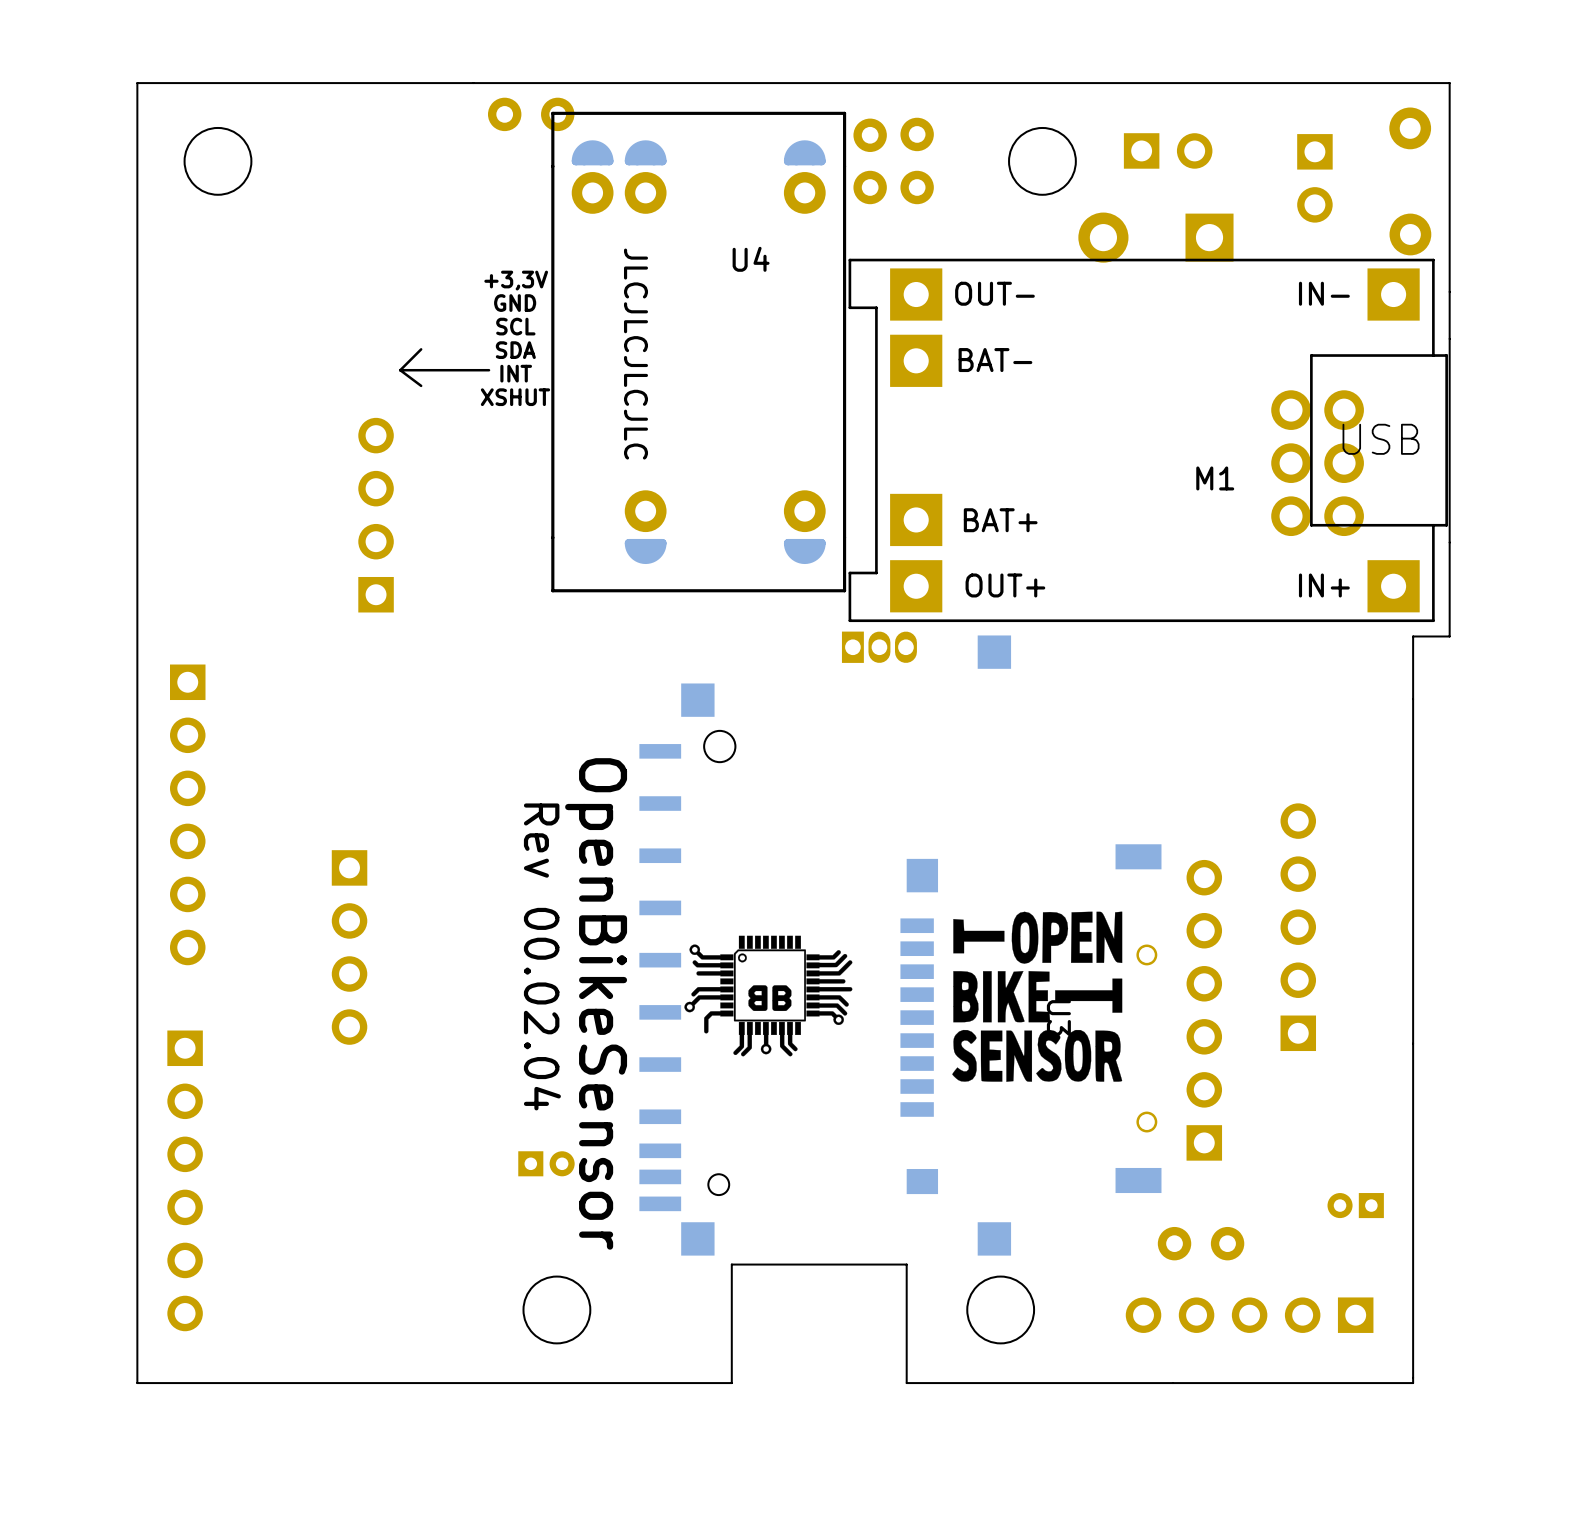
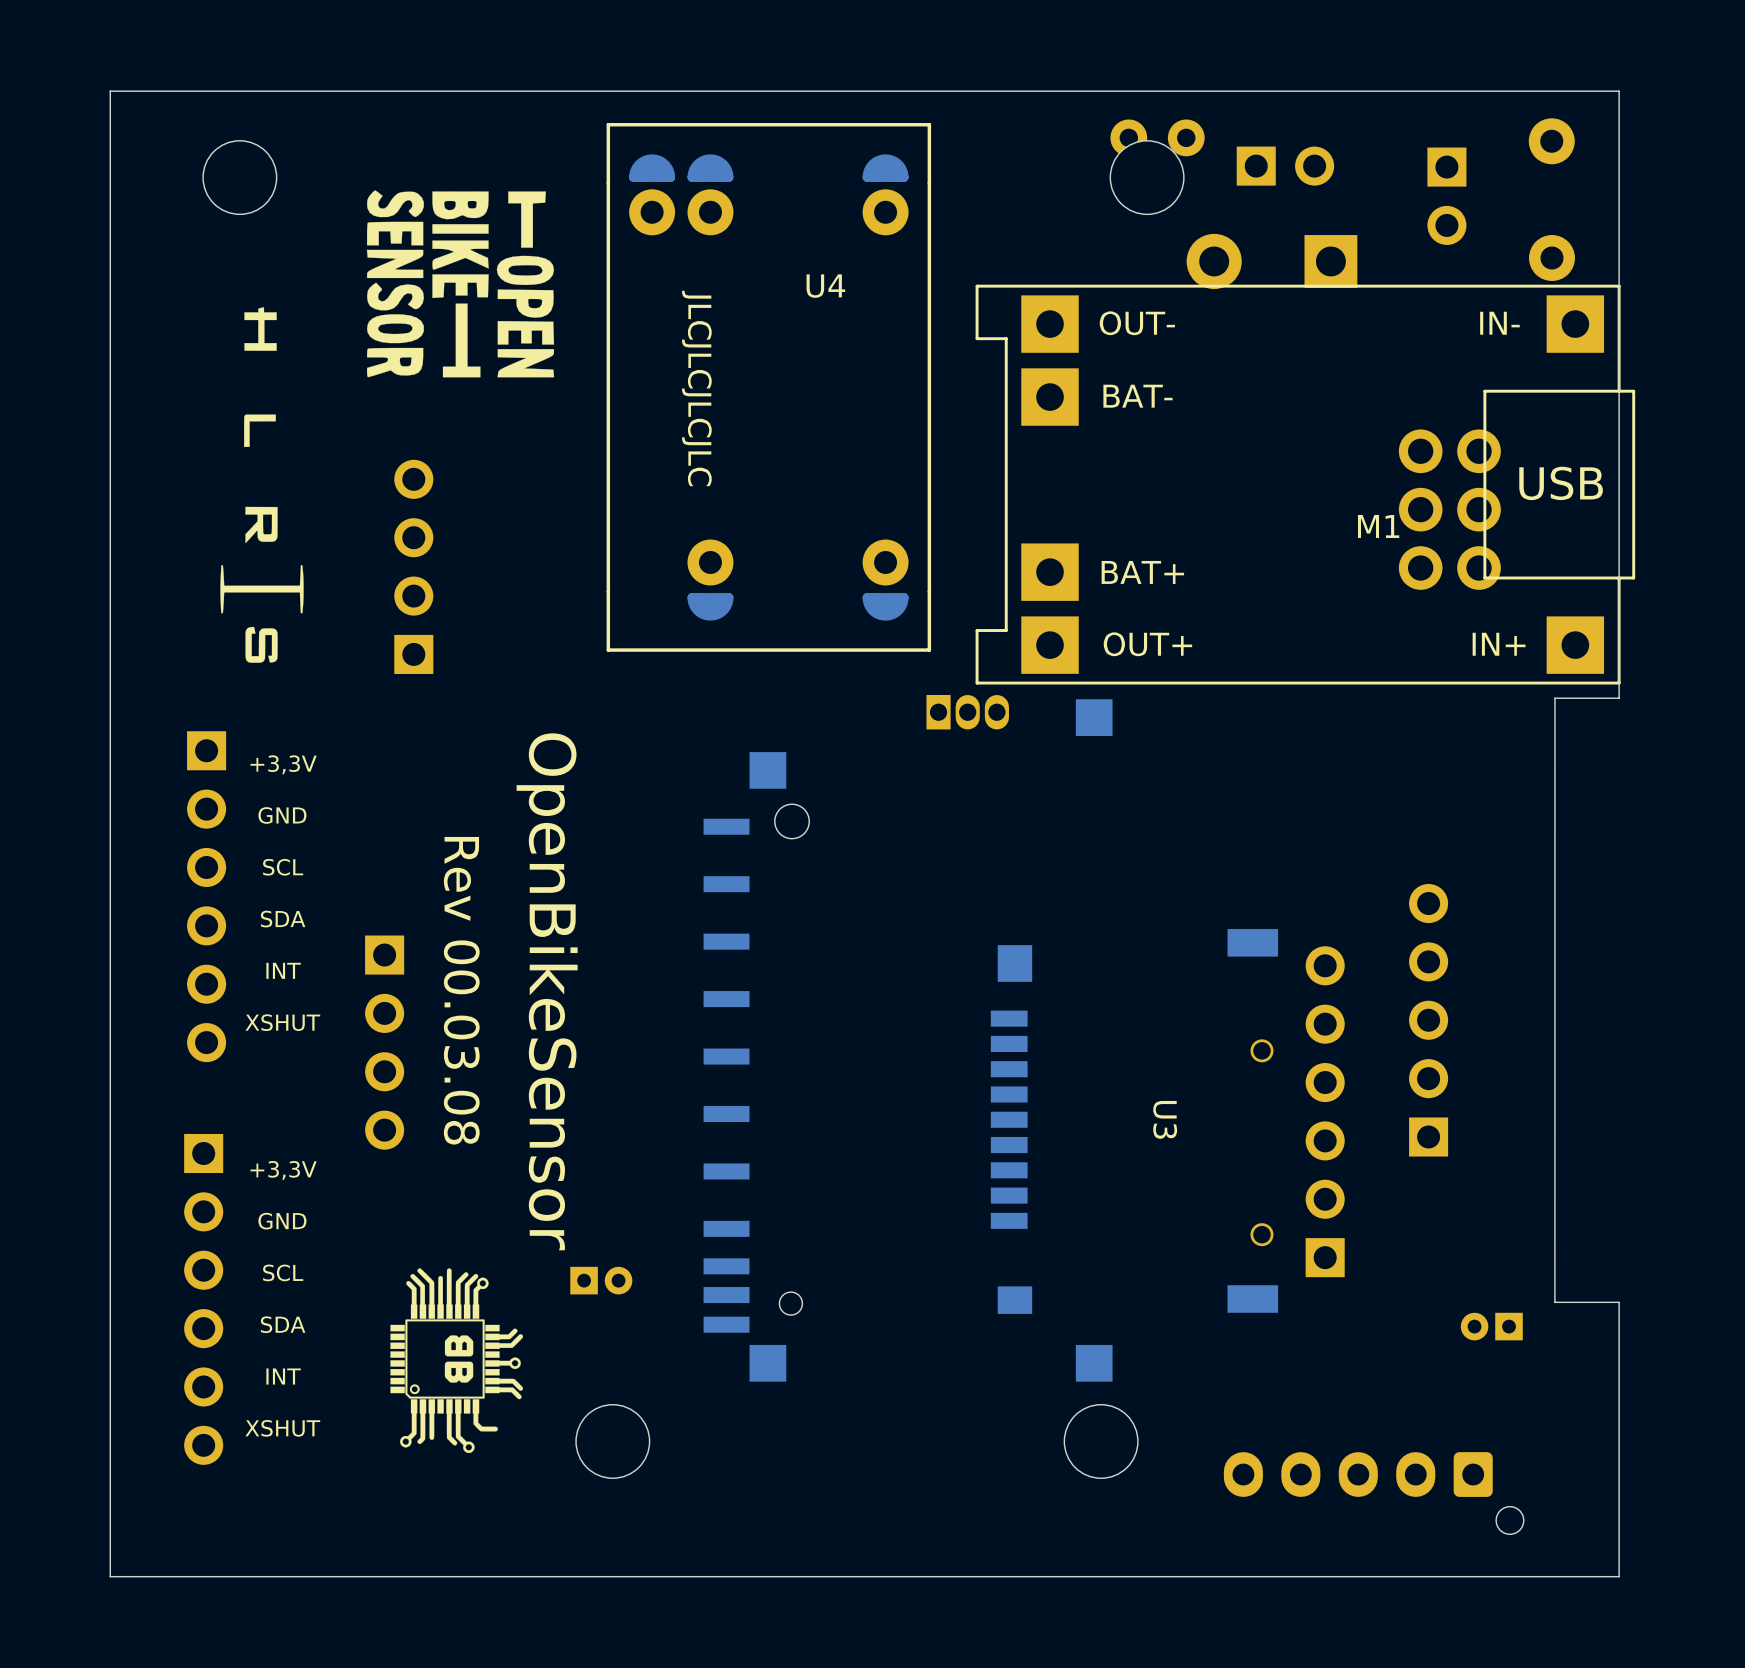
board edge: (1449, 83) (1449, 636) (1413, 636) (1413, 1383) (906, 1383) (906, 1264) (731, 1264) (731, 1383) (137, 1383) (137, 83) (1449, 83) -> (1619, 91) (1619, 698) (1554, 698) (1554, 1302) (1619, 1302) (1619, 1576) (110, 1576) (110, 91) (1619, 91)
part: (531, 114) -> none
part: (917, 160) -> none
part rotation: 0° (870, 161) -> 90° clockwise (1157, 137)
part position: (870, 161) -> (1157, 137)
drawing: none -> [366, 190, 555, 378]
drawing: none -> [220, 307, 304, 663]
text: +3,3V (516, 280) -> none
text: GND (515, 303) -> none
text: SCL (515, 326) -> none
line: (421, 349) (400, 370) -> none
text: SDA (515, 350) -> none
line: (400, 370) (421, 385) -> none
line: (489, 370) (400, 370) -> none
text: INT (516, 373) -> none
text: XSHUT (515, 397) -> none
M1 position: (1148, 440) -> (1305, 484)
text: none -> +3,3V (283, 764)
text: none -> GND (282, 815)
text: none -> SCL (283, 867)
text: none -> SDA (283, 919)
text: none -> INT (283, 970)
text: none -> Rev 00.03.08 (461, 990)
drawing: [952, 911, 1123, 1082] -> none
text: none -> XSHUT (282, 1022)
drawing: [684, 935, 853, 1057] -> none
text: Rev 00.02.04 (542, 956) -> none
text position: OpenBikeSensor (596, 1003) -> OpenBikeSensor (547, 991)
text: none -> +3,3V (283, 1170)
text: none -> GND (282, 1221)
drawing: none -> [390, 1268, 524, 1454]
text: none -> SCL (283, 1272)
text: none -> SDA (283, 1324)
part: (1201, 1243) -> none
text: none -> INT (283, 1376)
text: none -> XSHUT (282, 1428)
part: (1249, 1315) -> none
part: none -> (1373, 1493)

